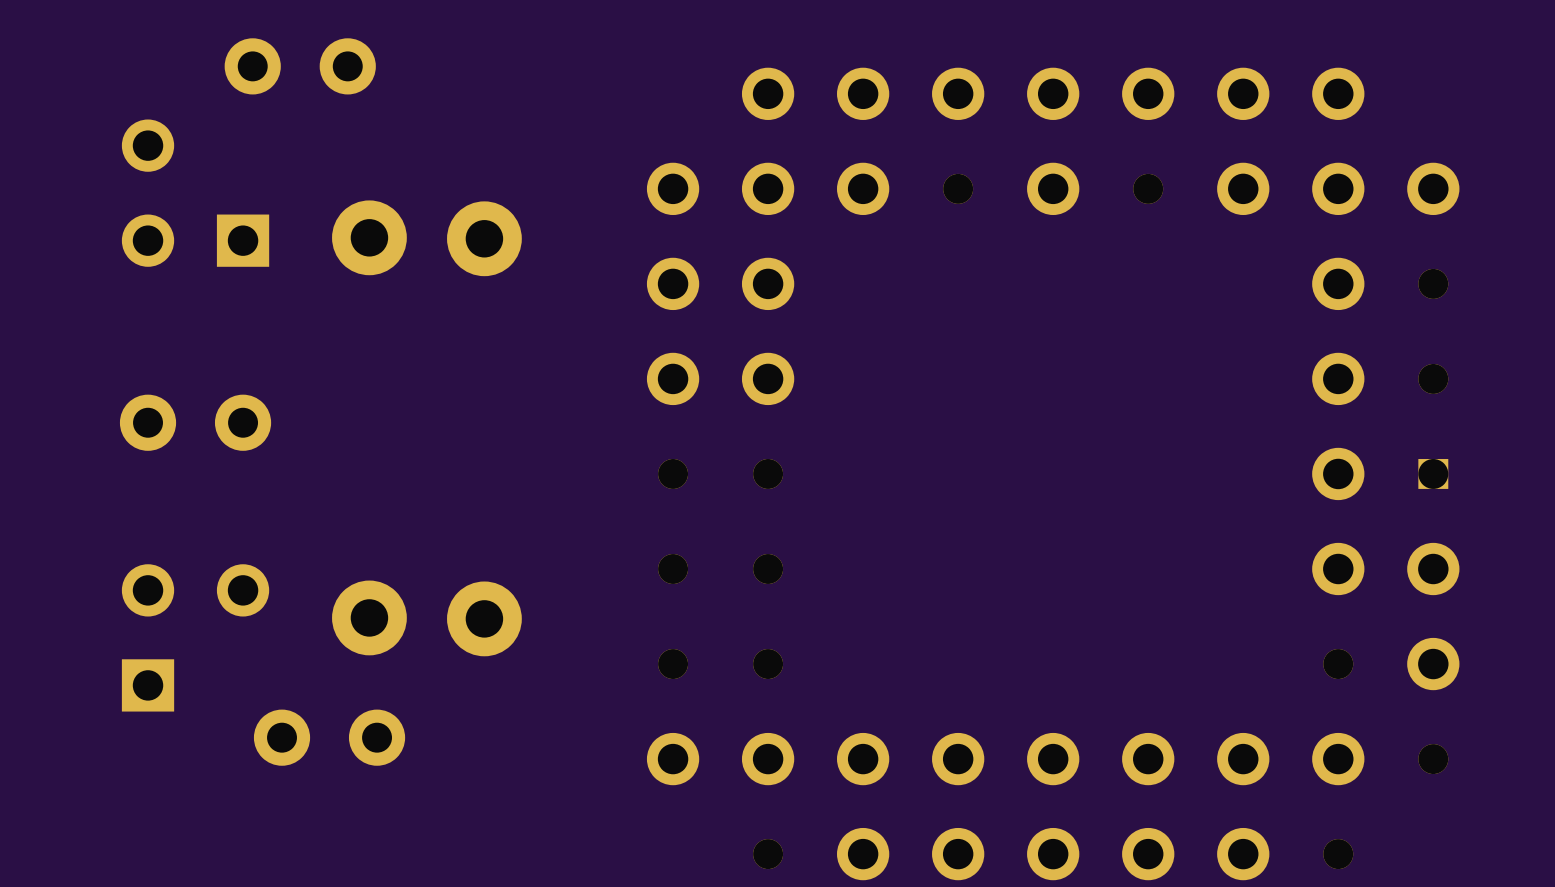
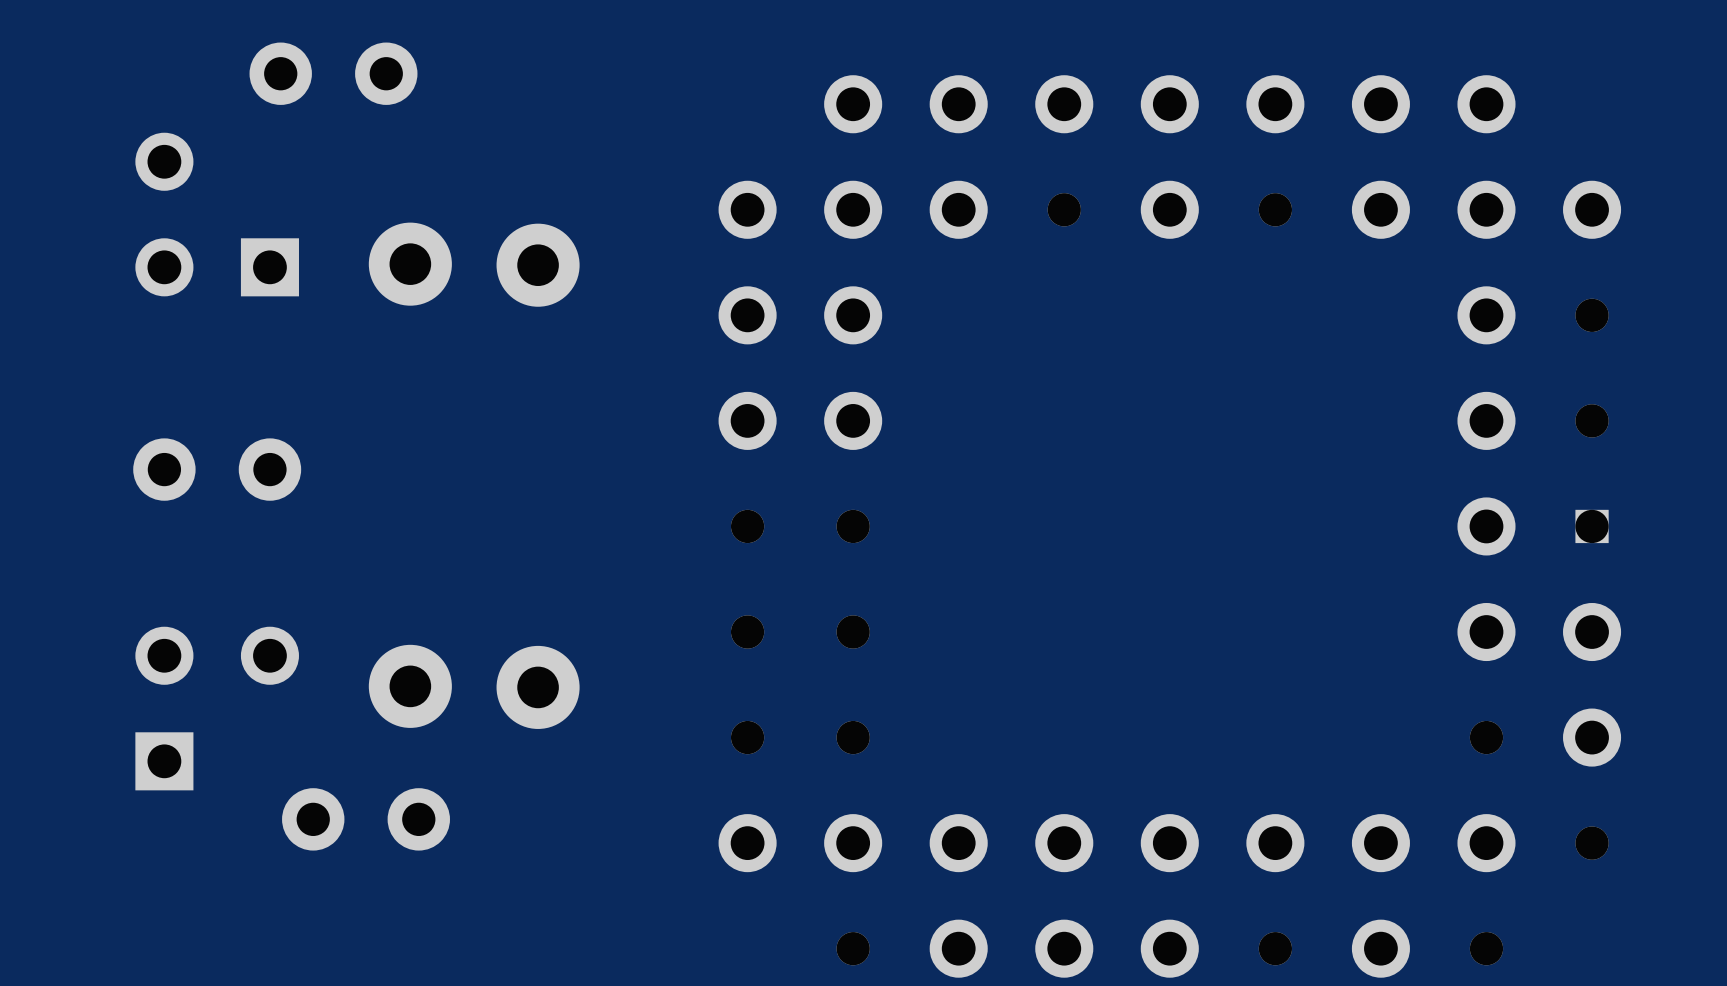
part footprint: [646, 67, 1460, 881] -> [718, 75, 1622, 978]

